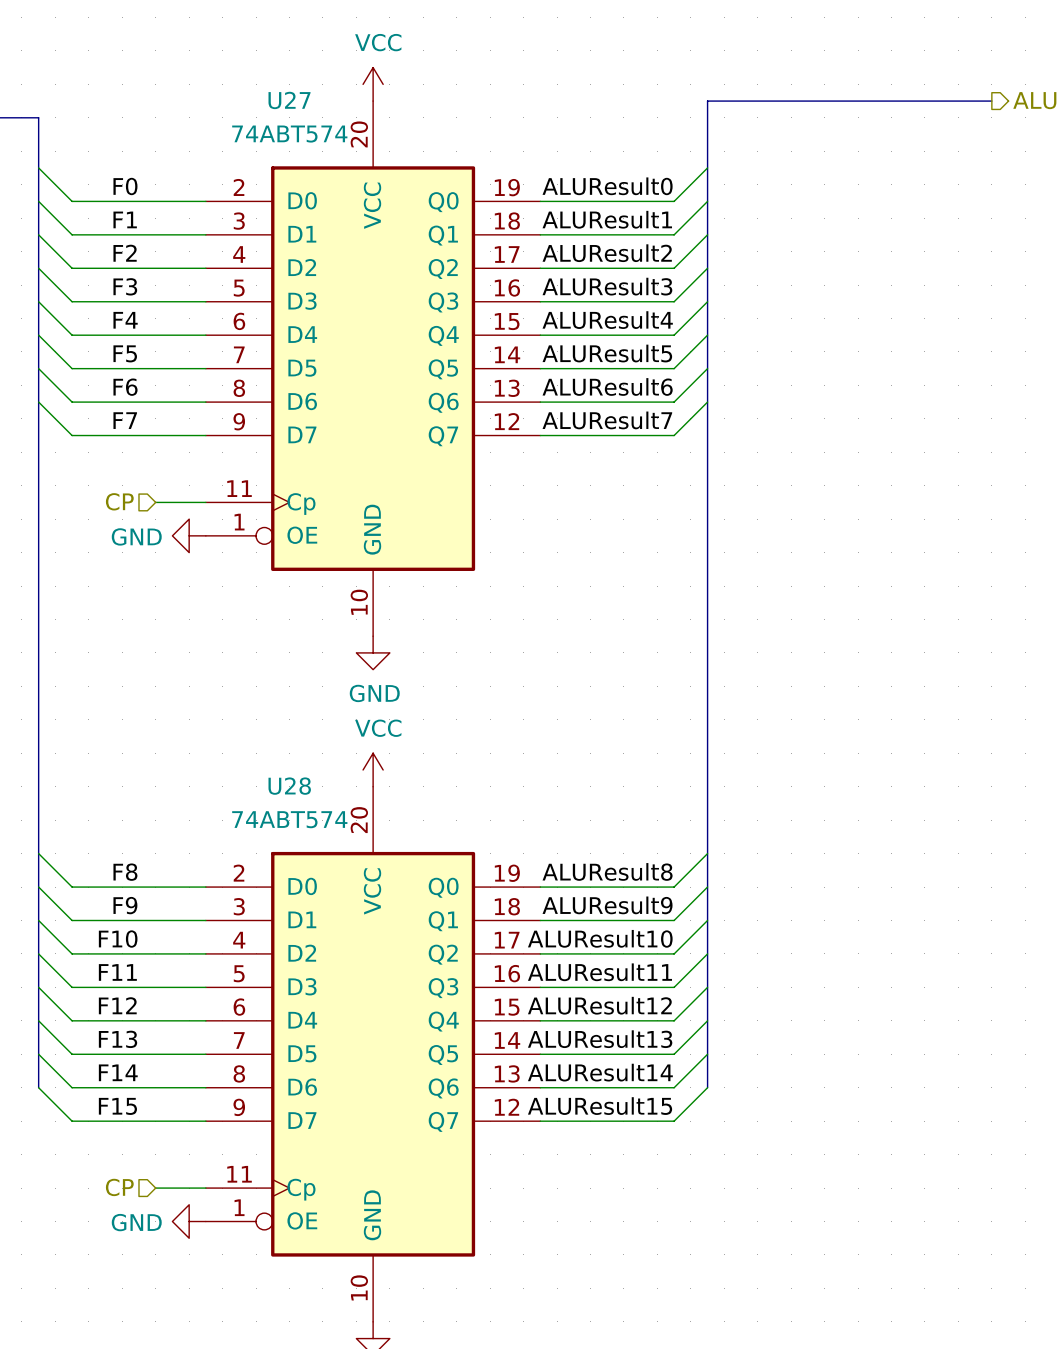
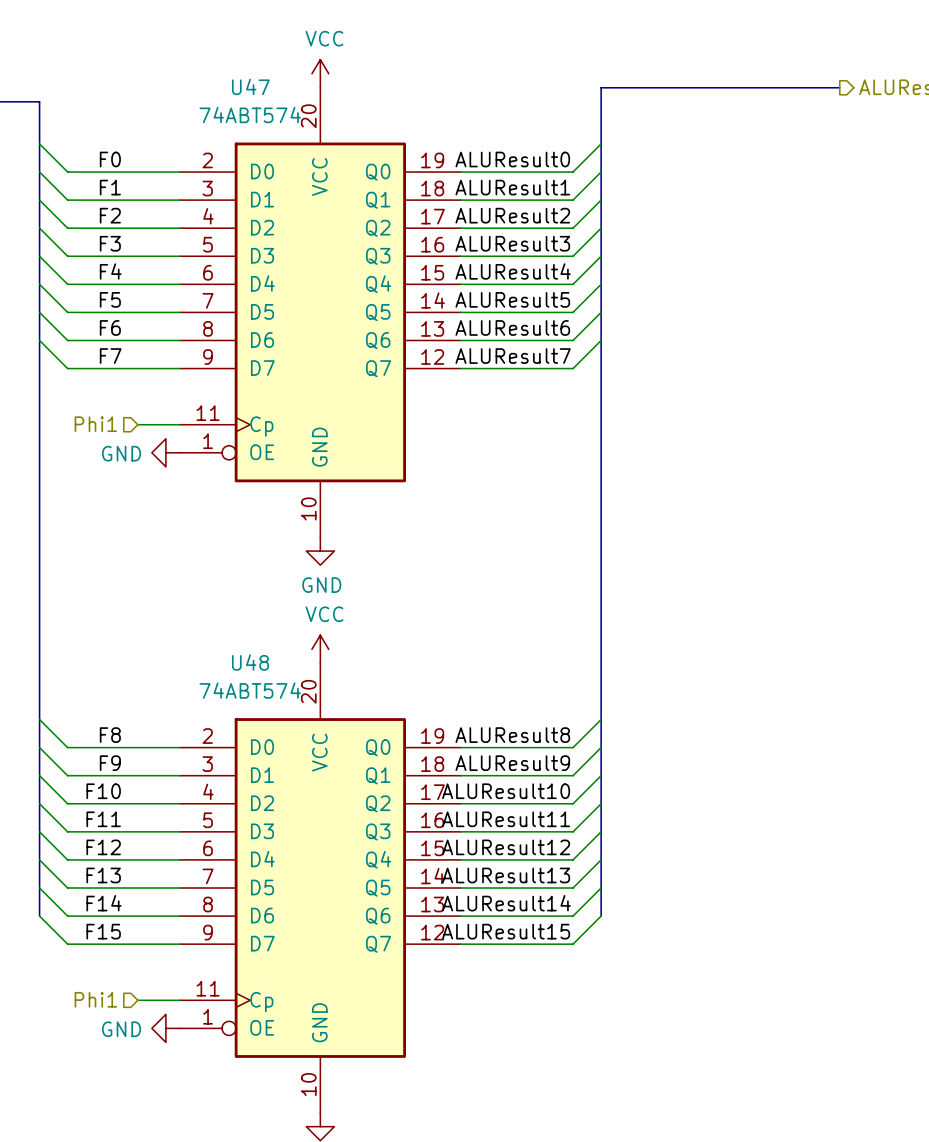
U27 name: U27 (289, 100) -> U47 (250, 86)
hierarchical label: CP (119, 501) -> Phi1 (95, 424)
U28 name: U28 (289, 786) -> U48 (250, 662)
hierarchical label: CP (119, 1187) -> Phi1 (95, 999)

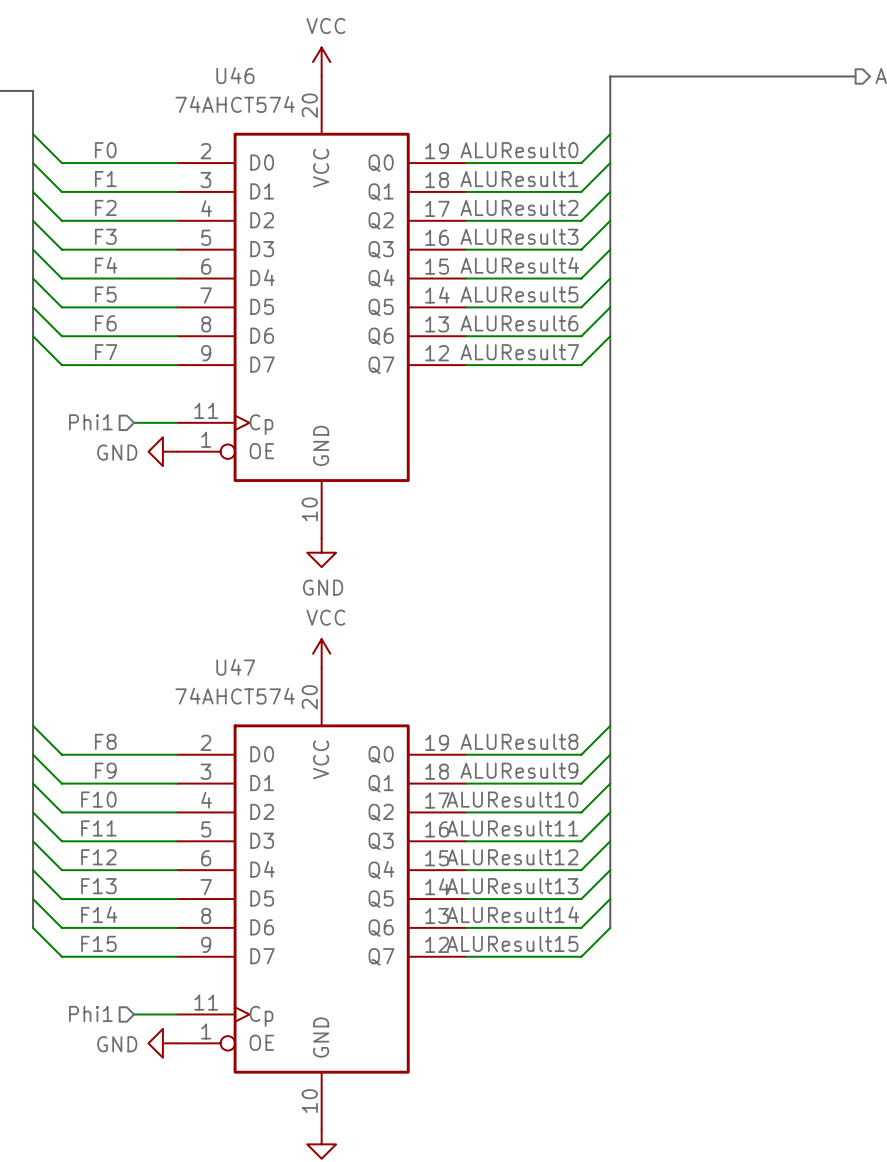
U47 name: U47 (250, 86) -> U46 (235, 75)
U47 value: 74ABT574 (250, 115) -> 74AHCT574 (235, 104)
U48 name: U48 (250, 662) -> U47 (235, 667)
U48 value: 74ABT574 (250, 690) -> 74AHCT574 (235, 696)

